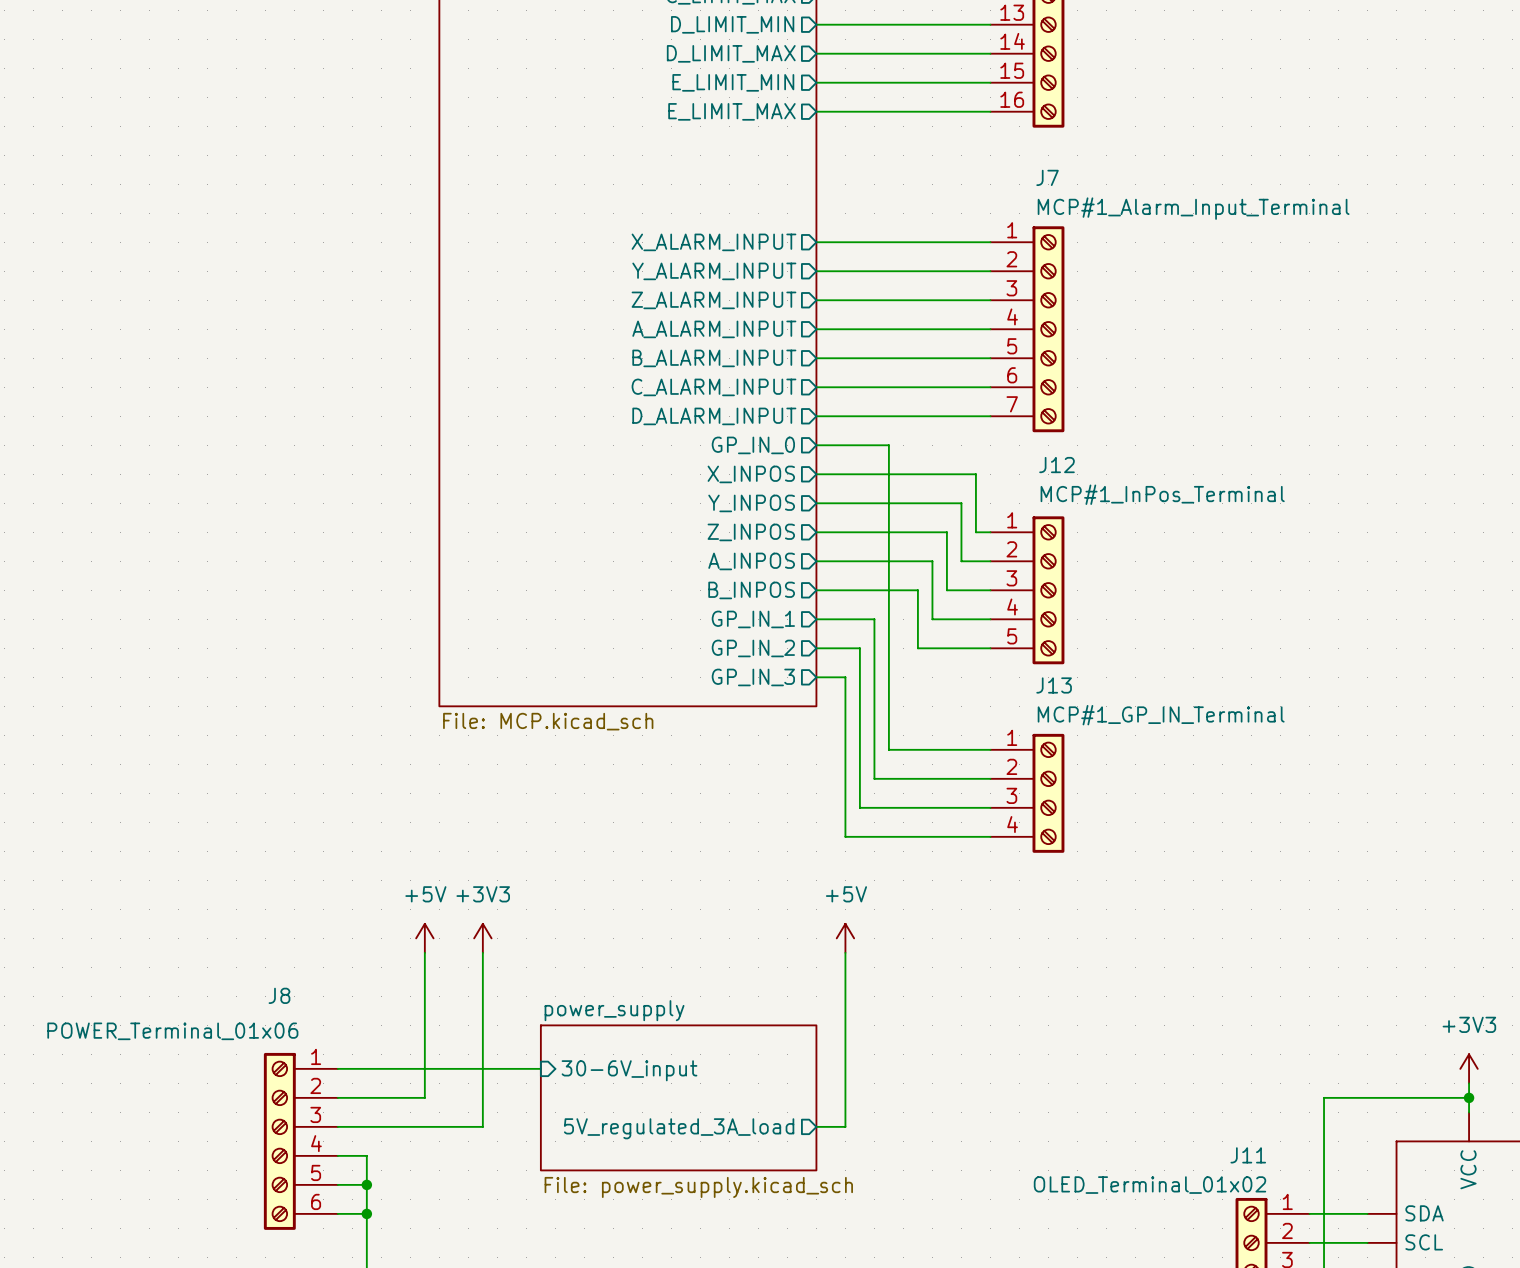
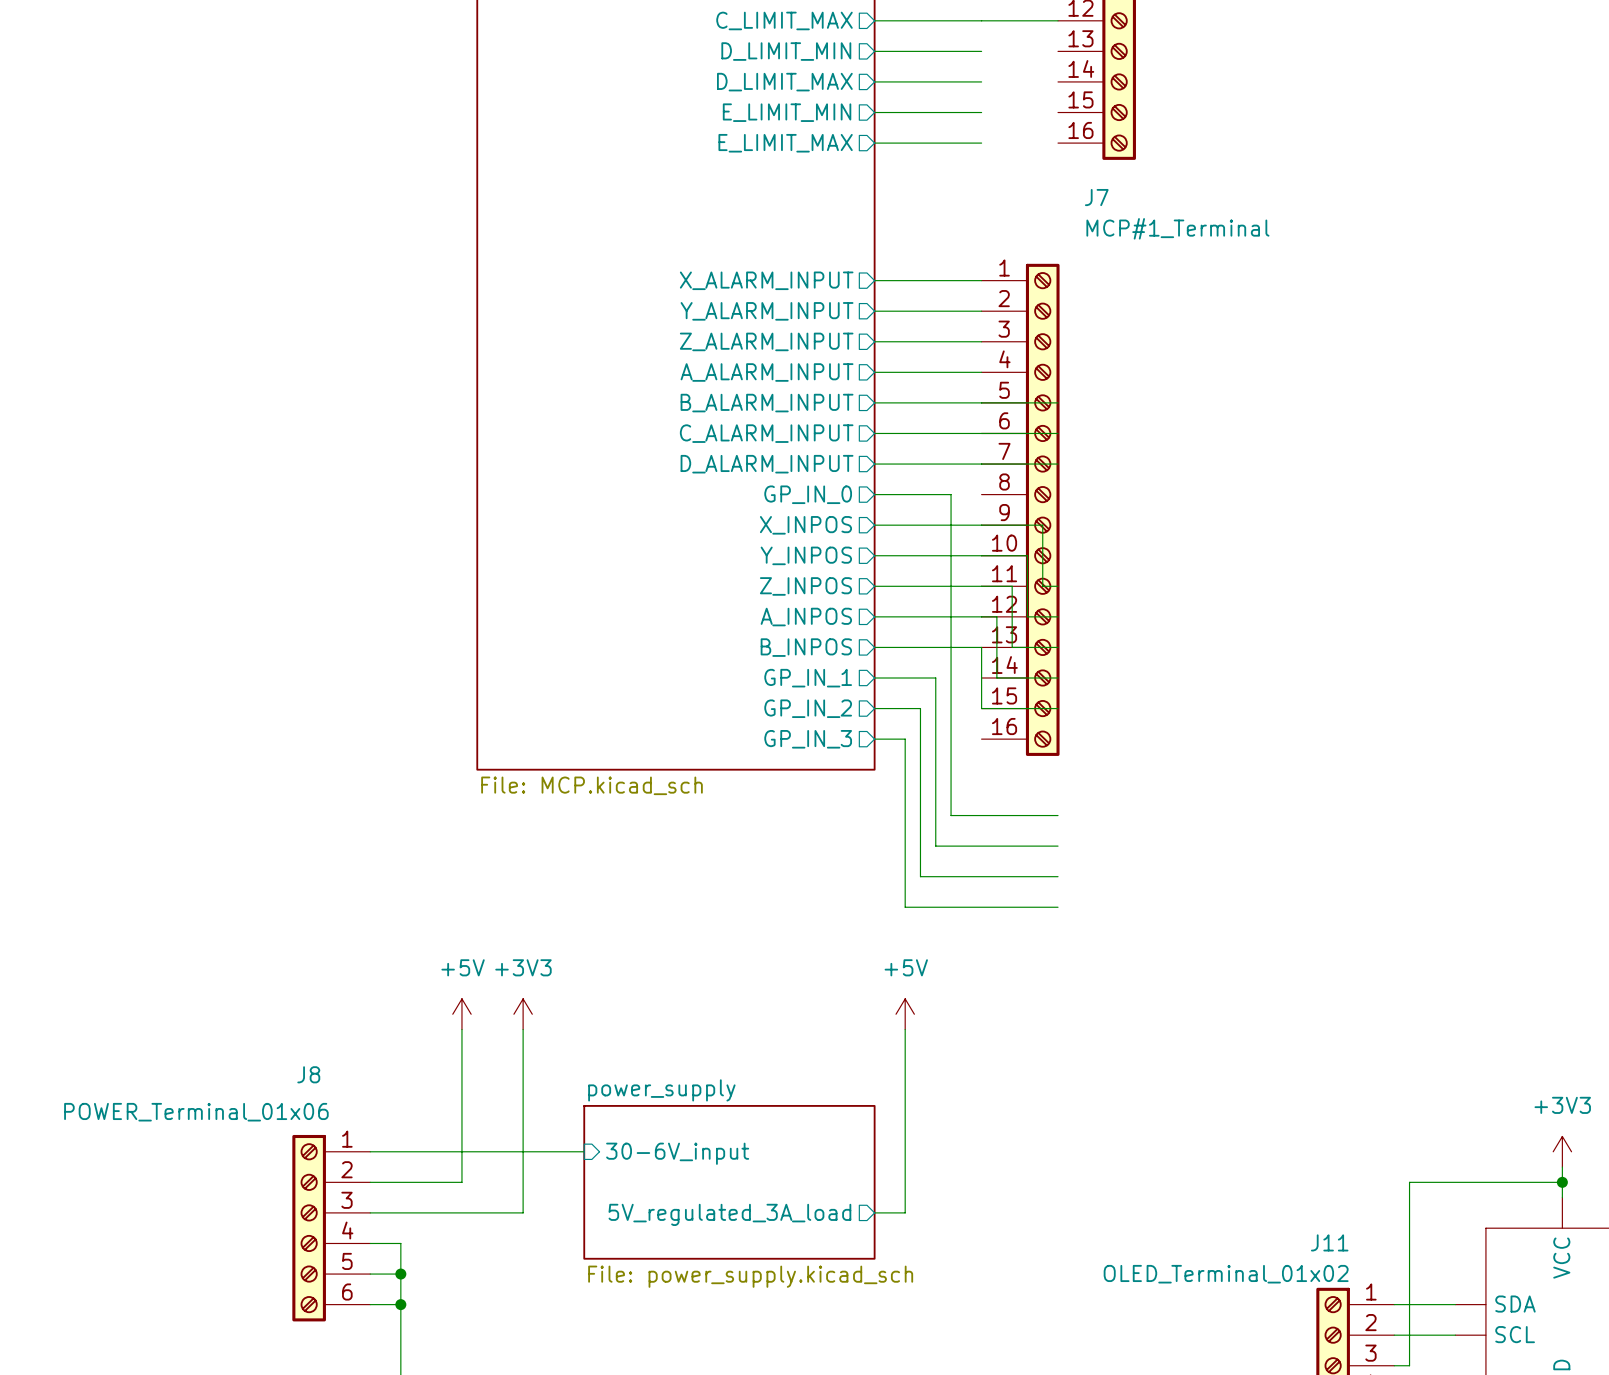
wire: (917, 24) (990, 24) -> none
wire: (917, 53) (990, 53) -> none
wire: (917, 82) (990, 82) -> none
wire: (917, 111) (990, 111) -> none
J7 name position: J7 (1047, 177) -> J7 (1096, 197)
J7 value: MCP#1_Alarm_Input_Terminal (1193, 208) -> MCP#1_Terminal (1177, 228)
J7 symbol: [990, 226, 1065, 433] -> [981, 263, 1060, 756]
J12: MCP#1_InPos_Terminal (1027, 590) -> none
J13: MCP#1_GP_IN_Terminal (1027, 793) -> none

